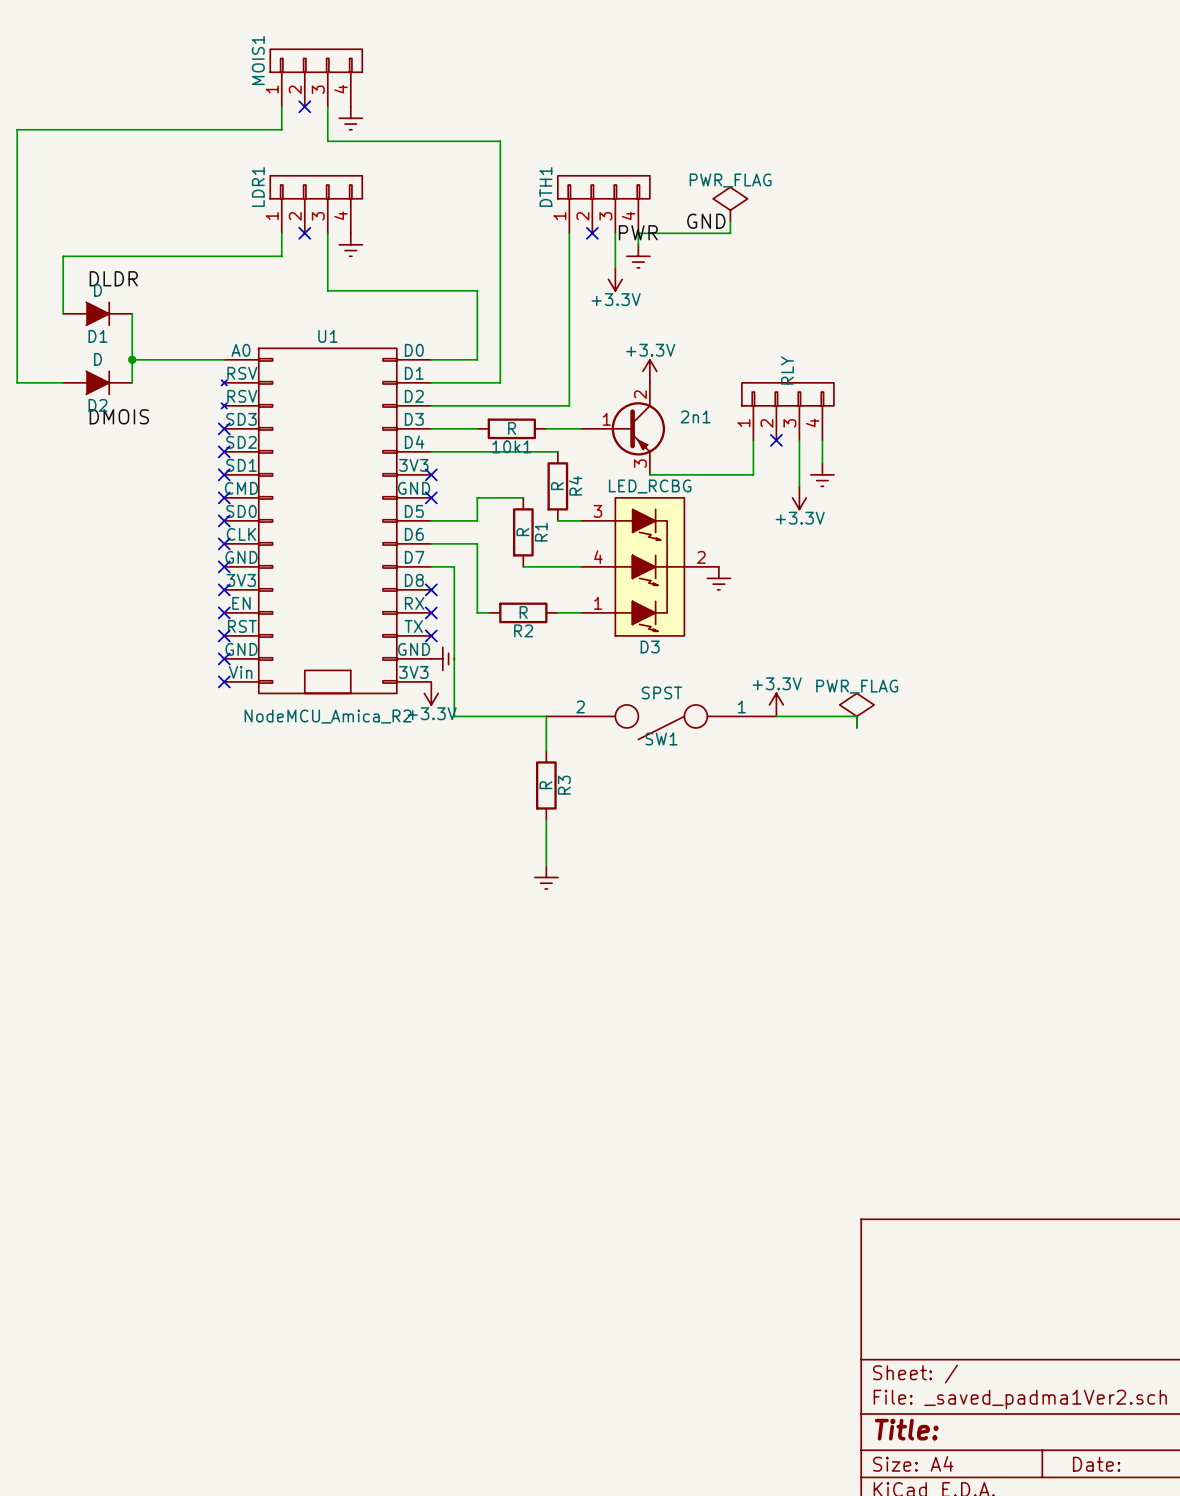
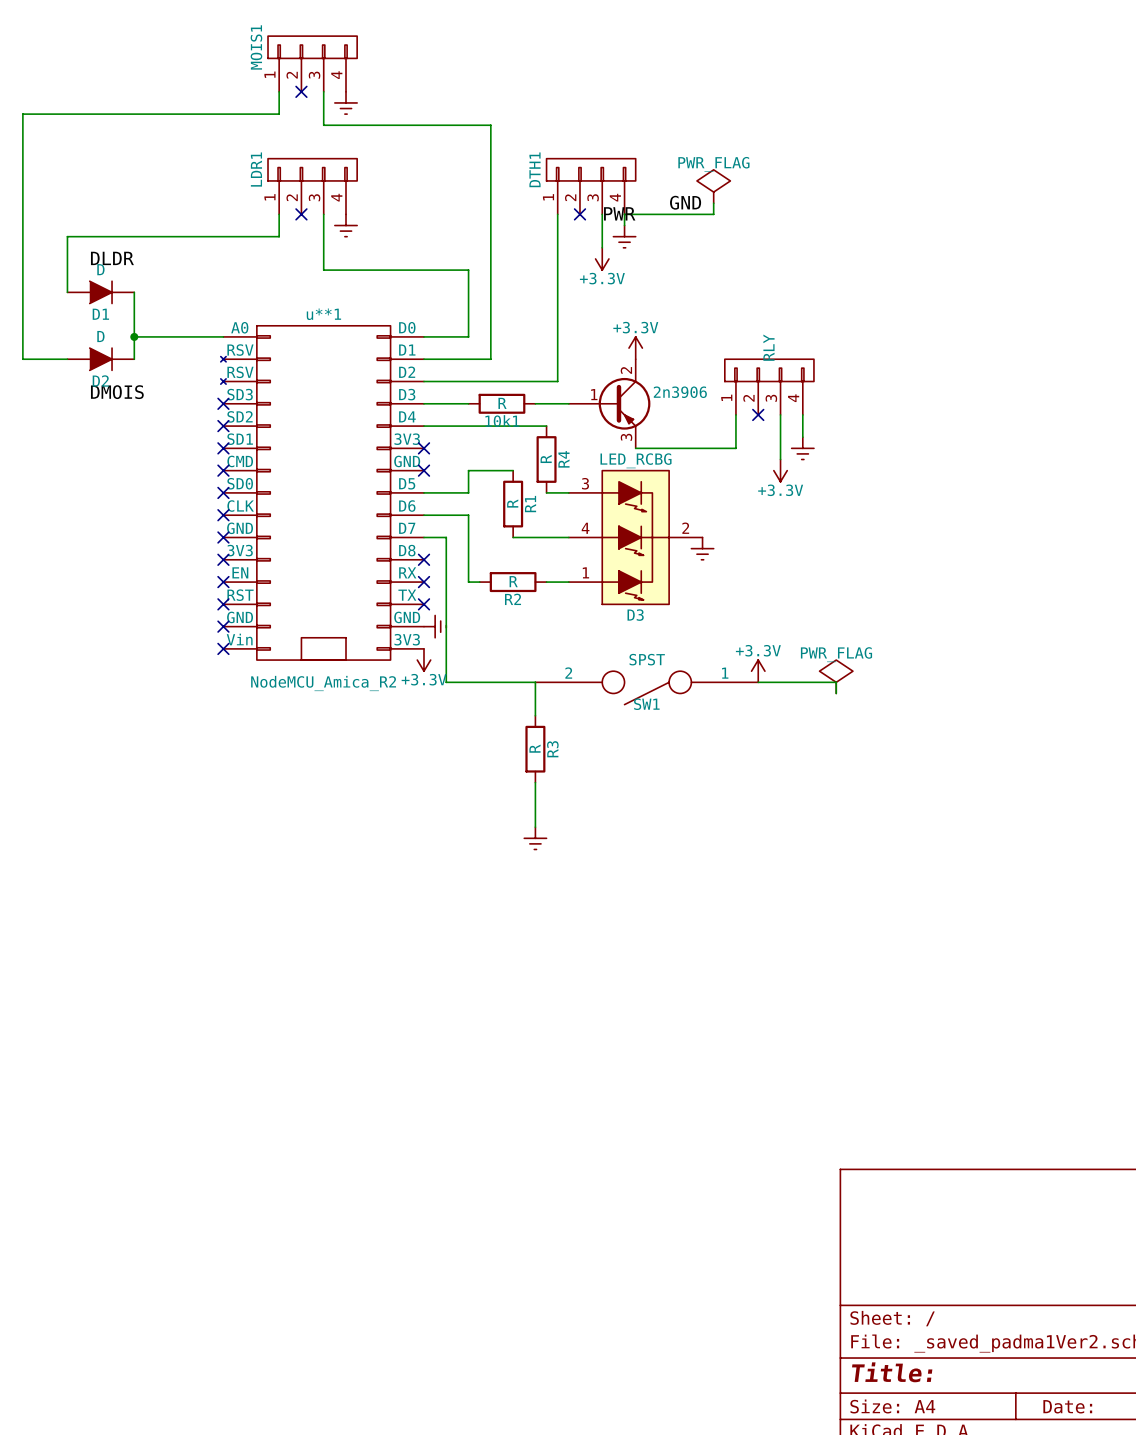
U1 name: U1 (328, 336) -> u**1 (323, 314)
2n1 name: 2n1 (695, 416) -> 2n3906 (680, 392)

